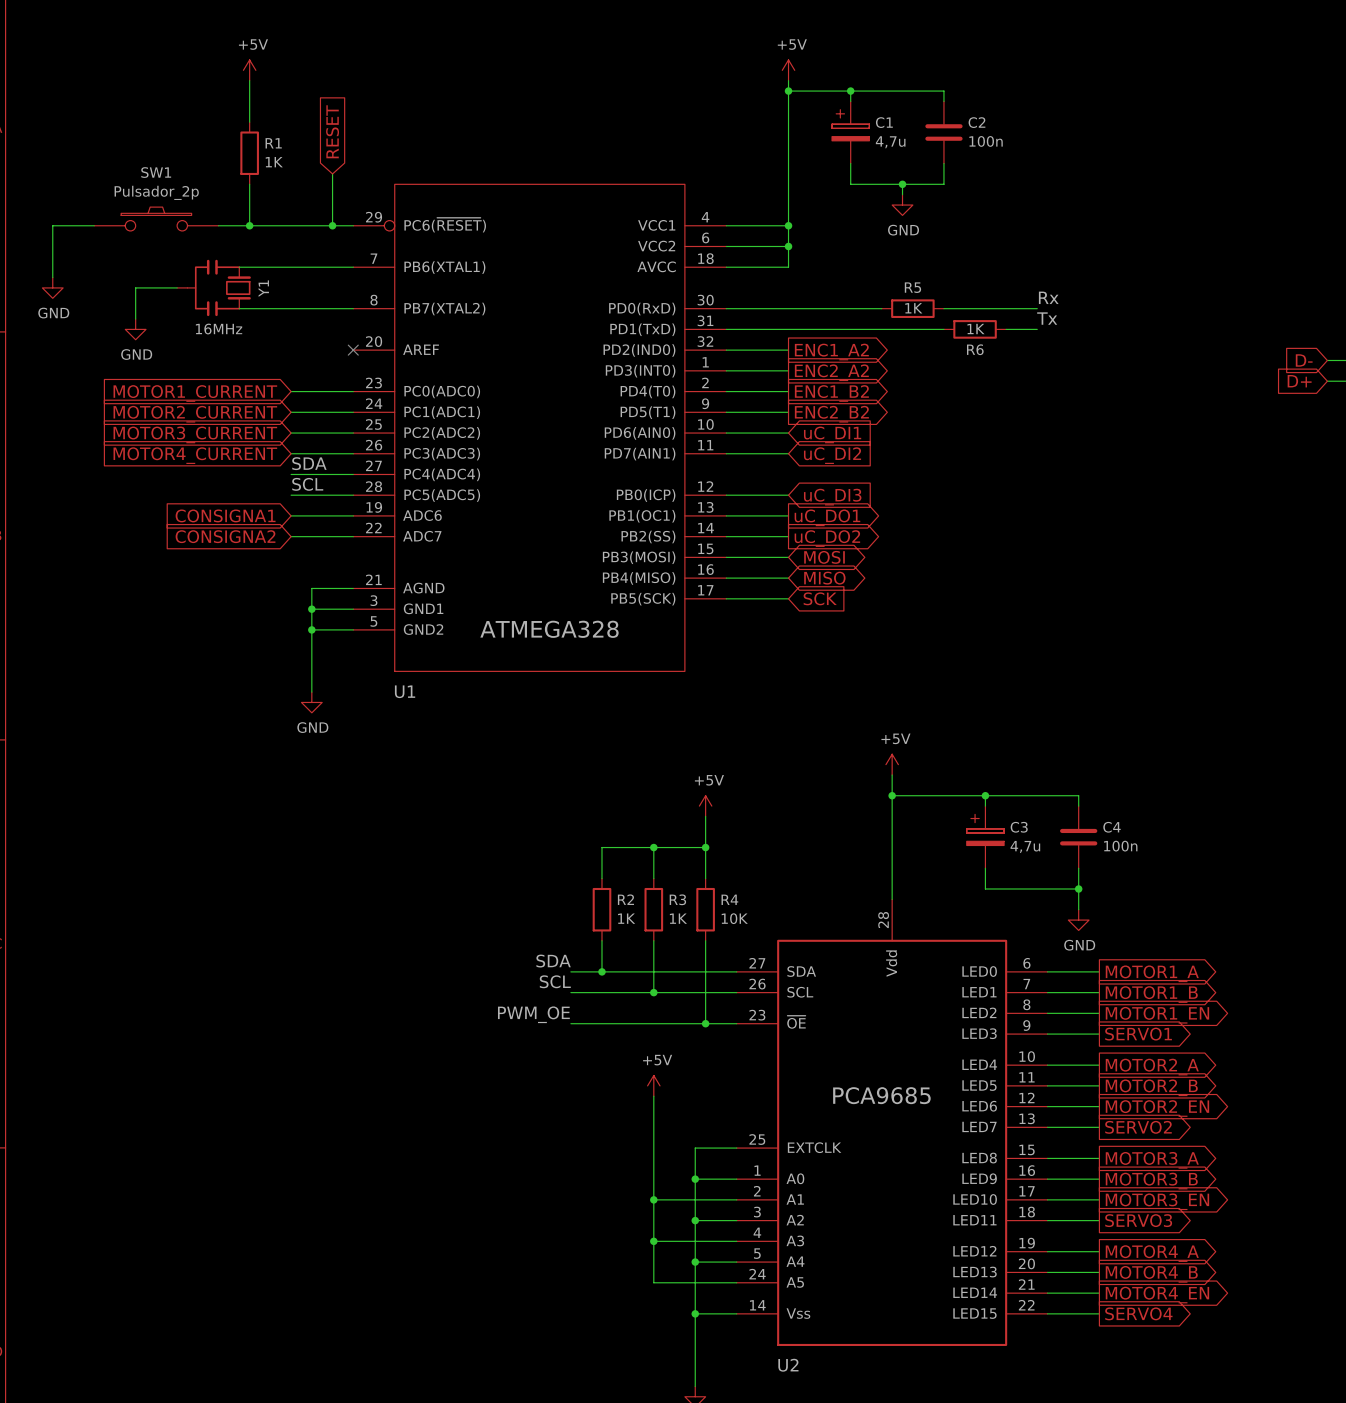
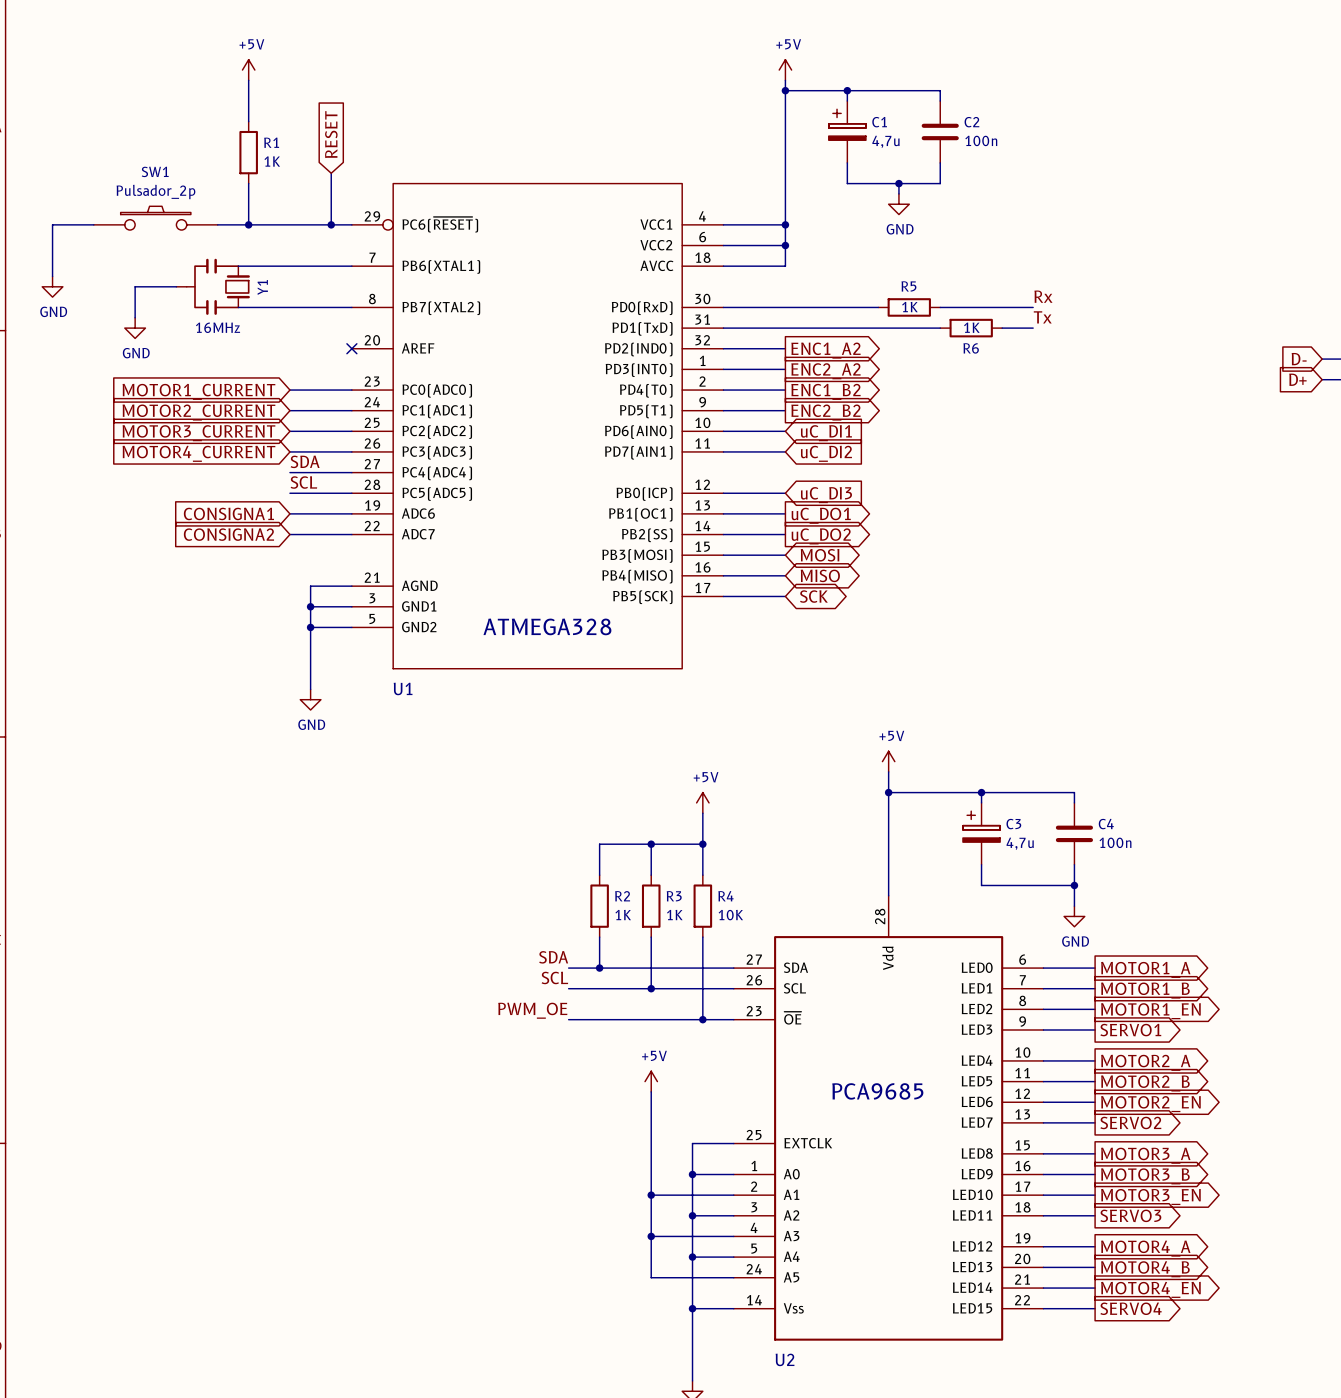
global label shape: input (820, 598) -> bidirectional (813, 596)

